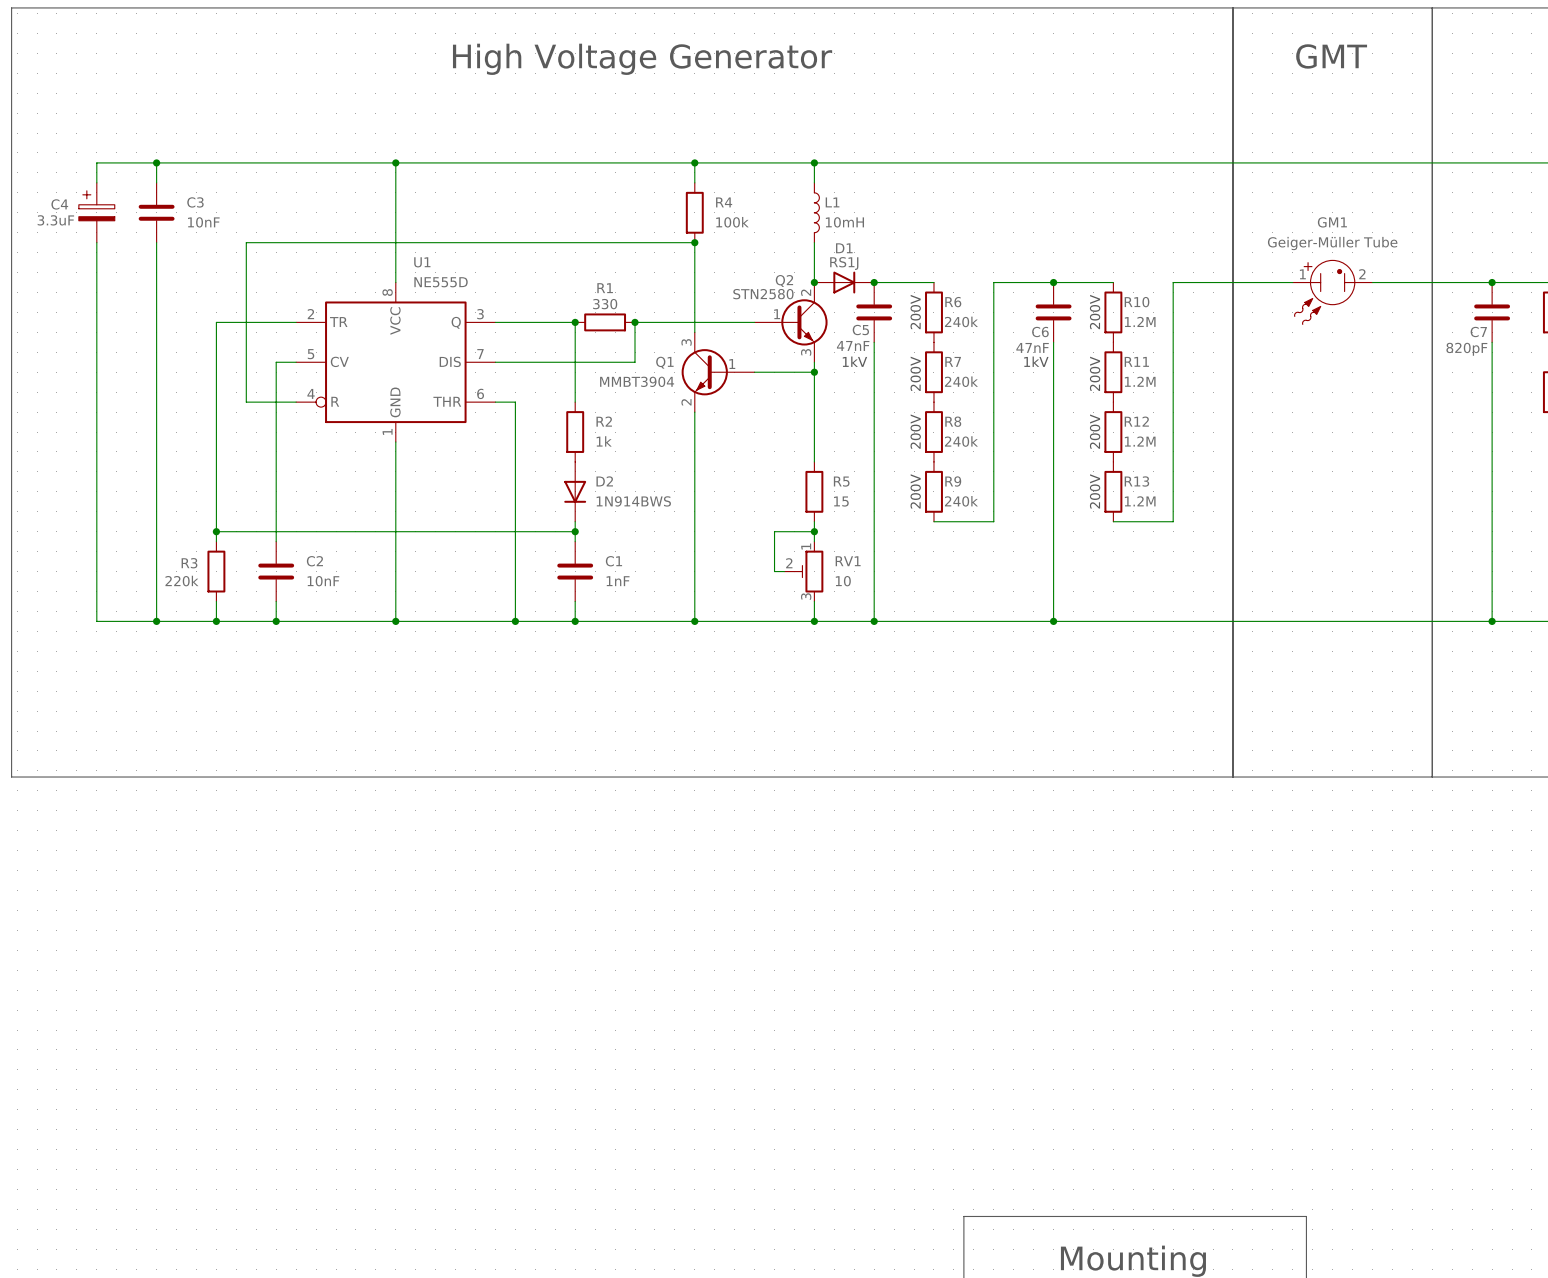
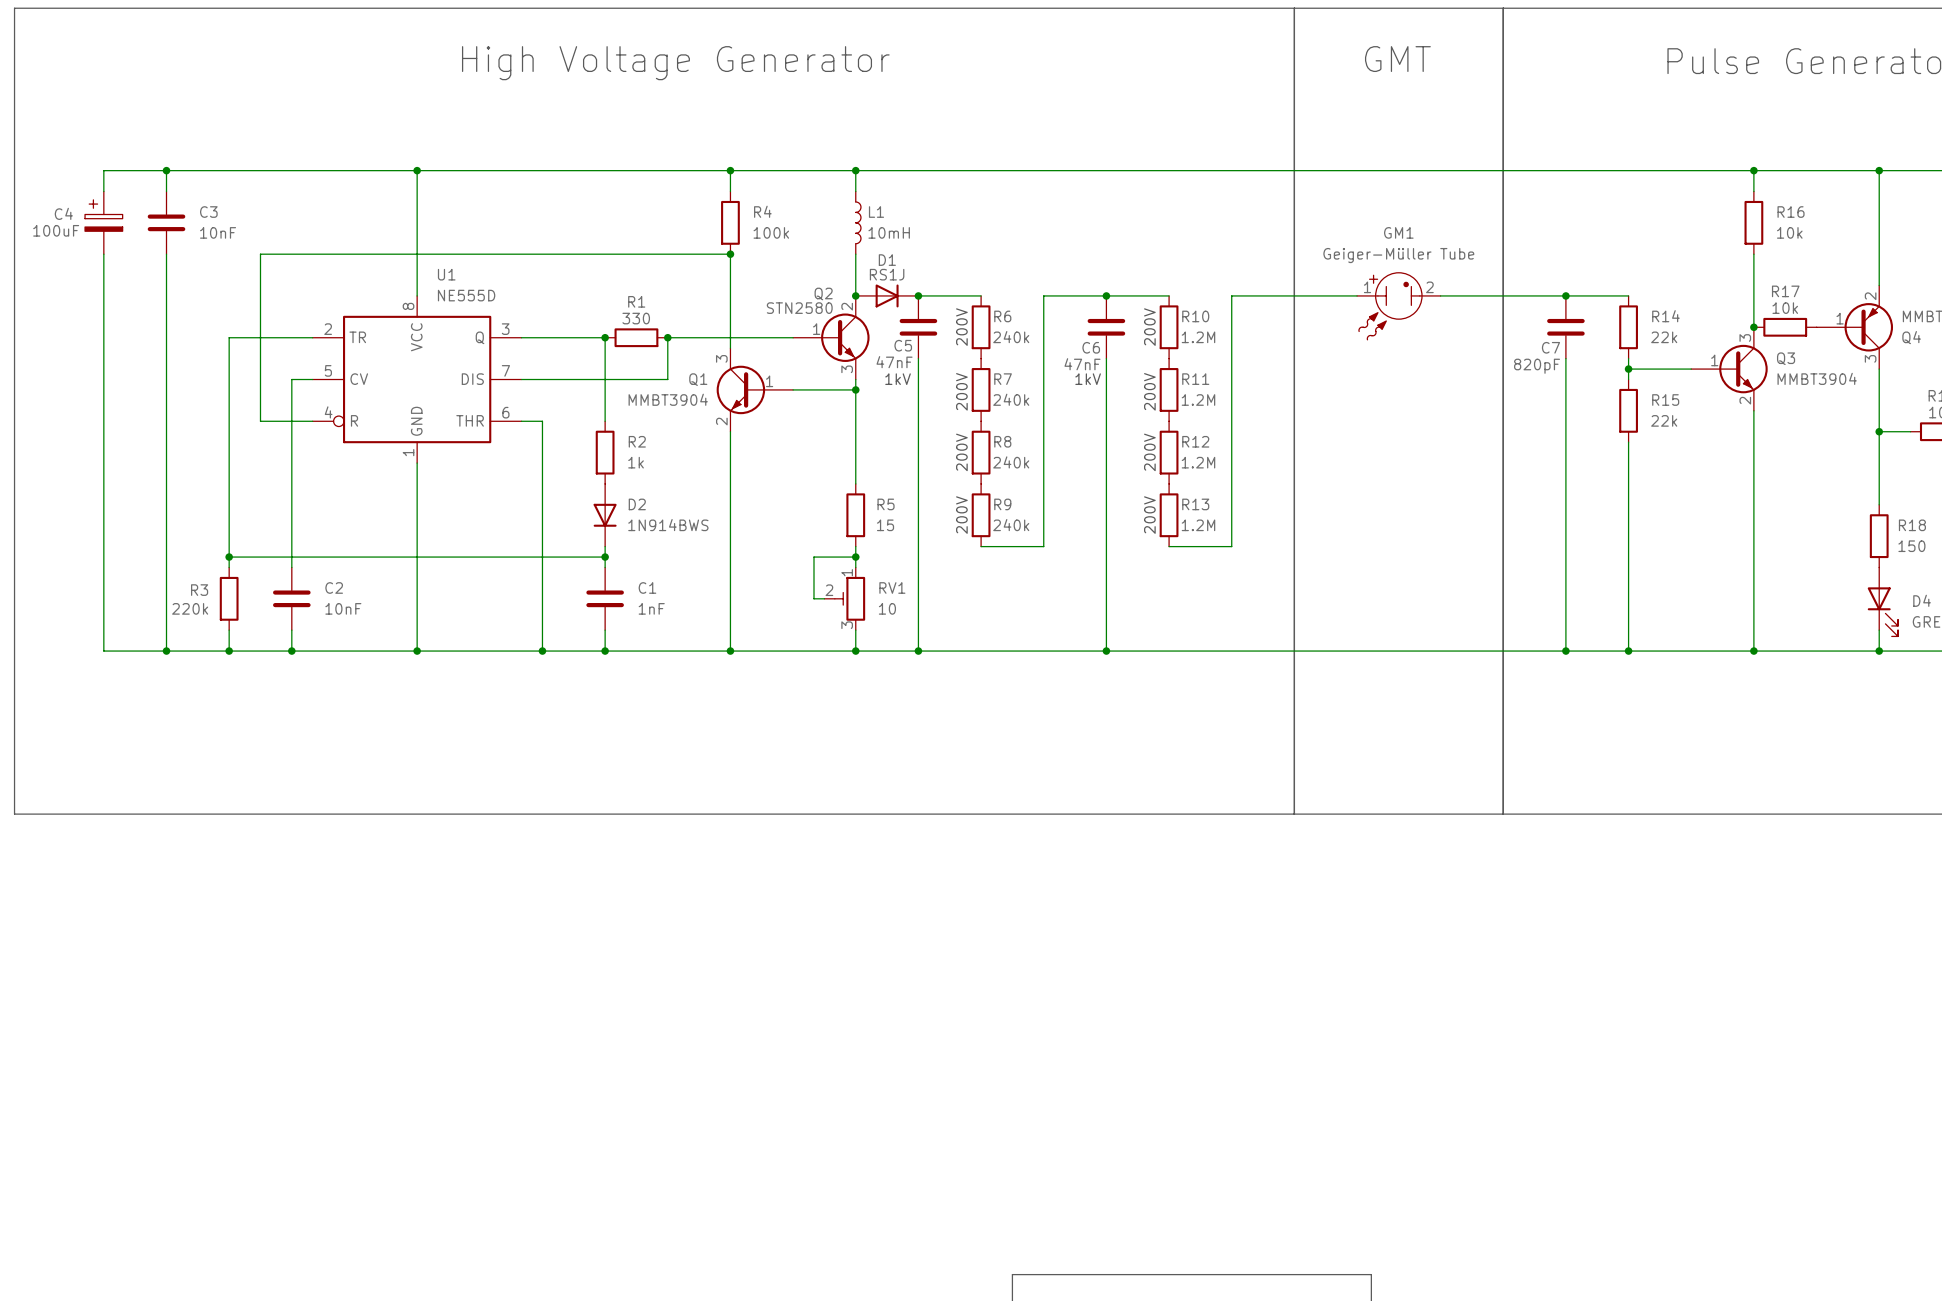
C4 value: 3.3uF (55, 220) -> 100uF (56, 230)

